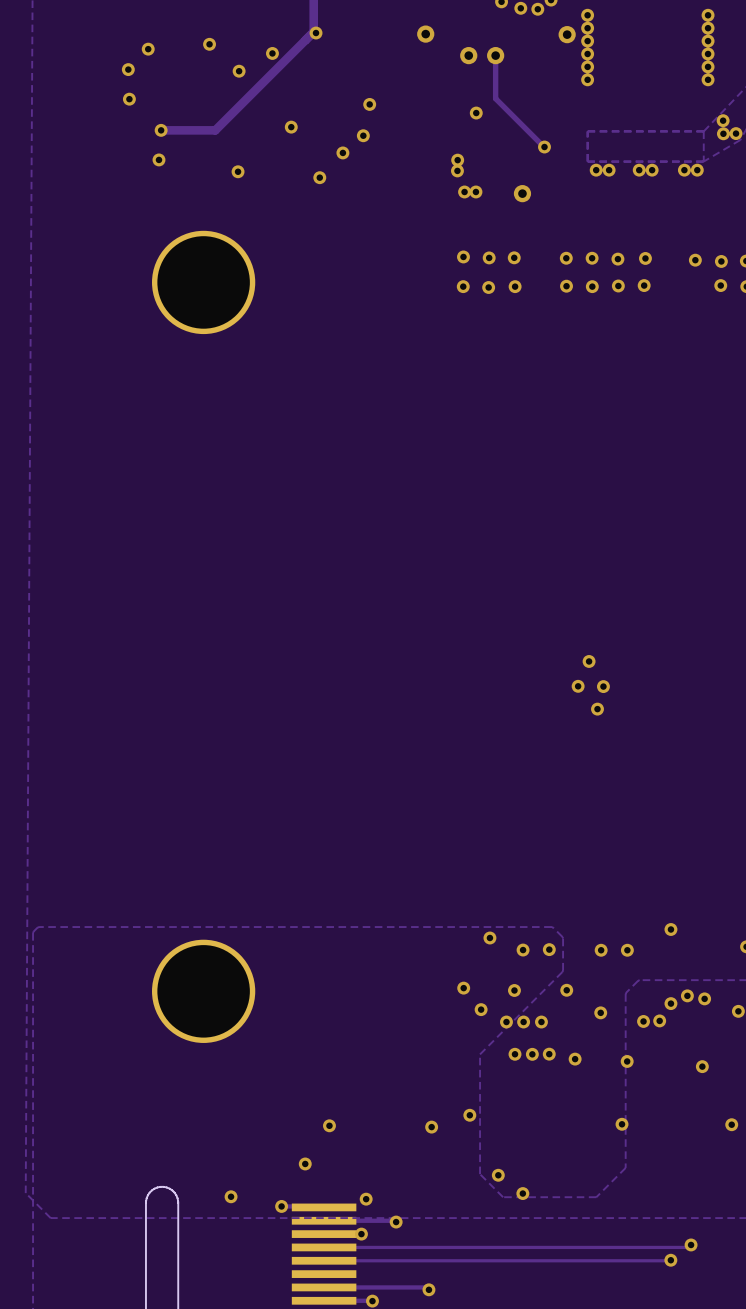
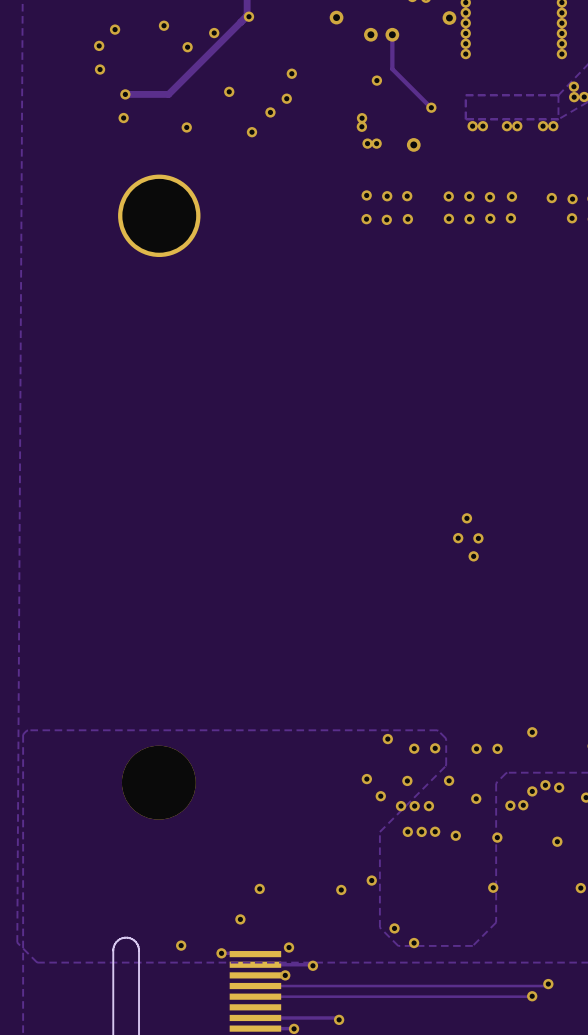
part footprint: [151, 939, 256, 1043] -> [121, 745, 196, 820]

